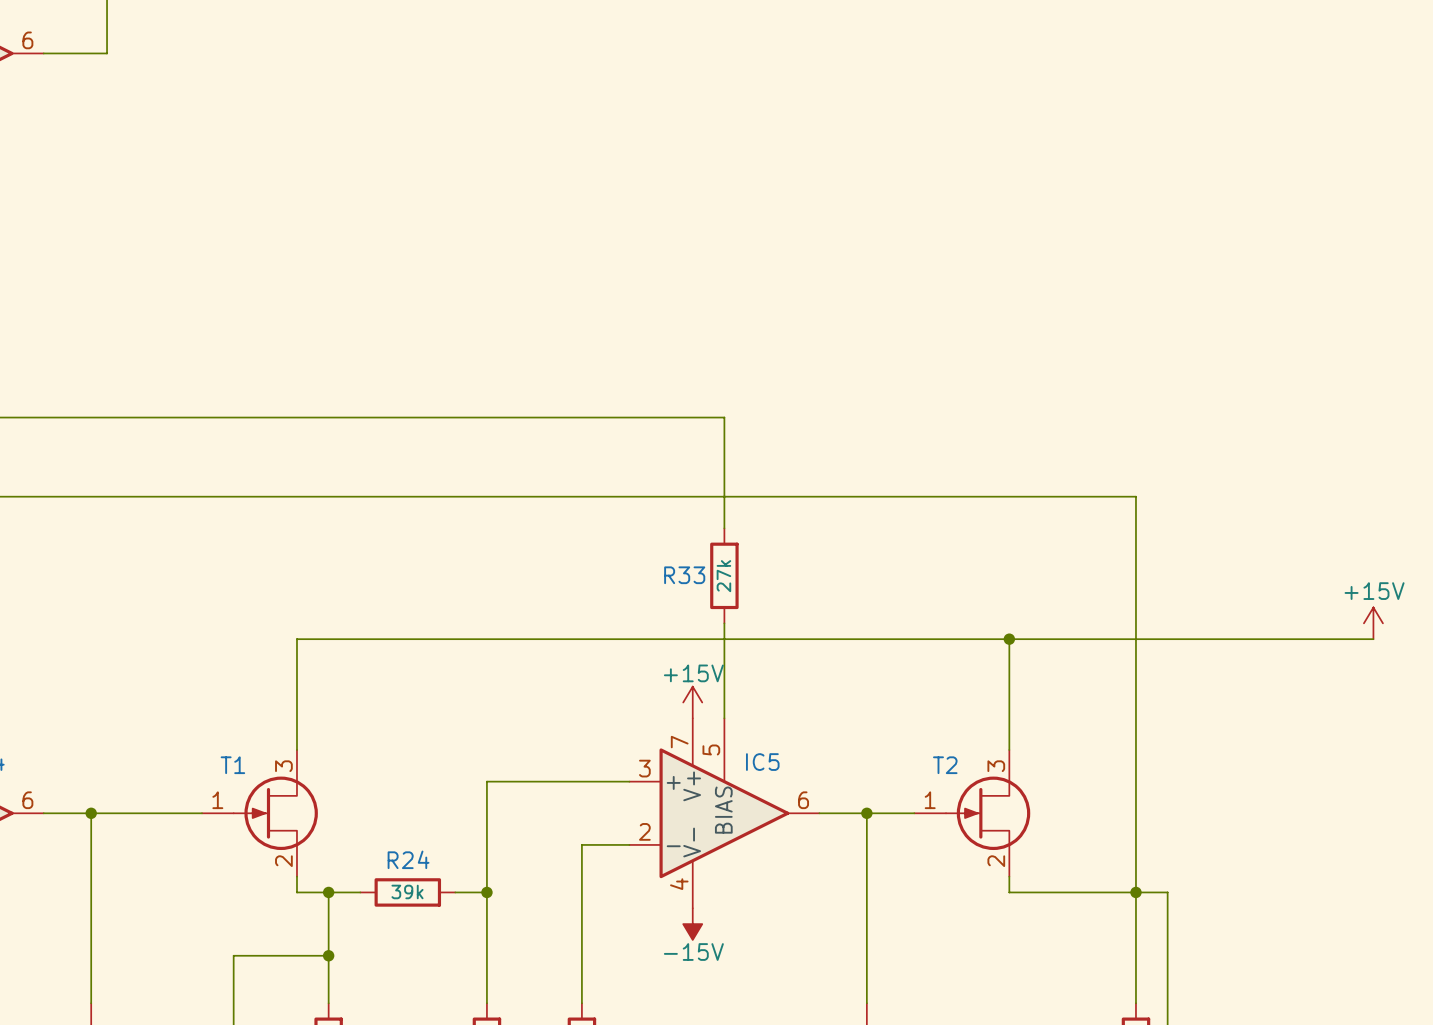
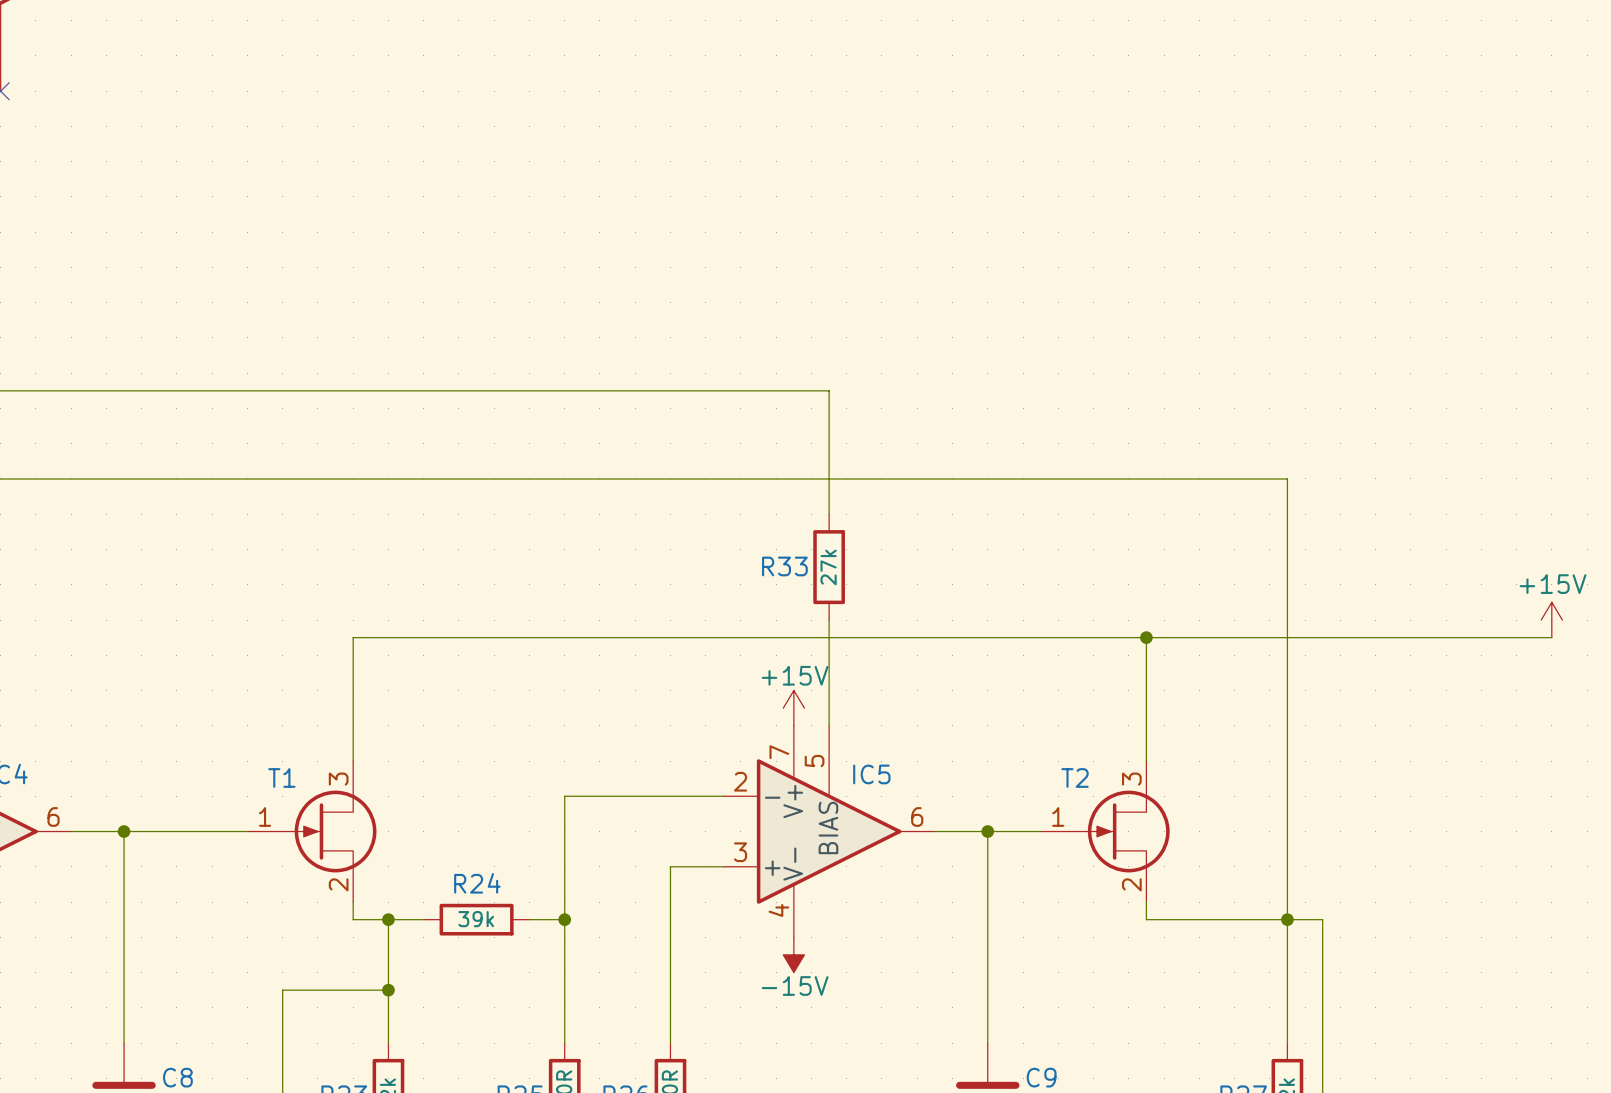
IC5 pin number: 3 (644, 768) -> 2 (740, 781)
IC5 pin name: + (673, 782) -> - (772, 797)
IC5 pin number: 2 (644, 831) -> 3 (740, 852)
IC5 pin name: - (673, 846) -> + (772, 868)

